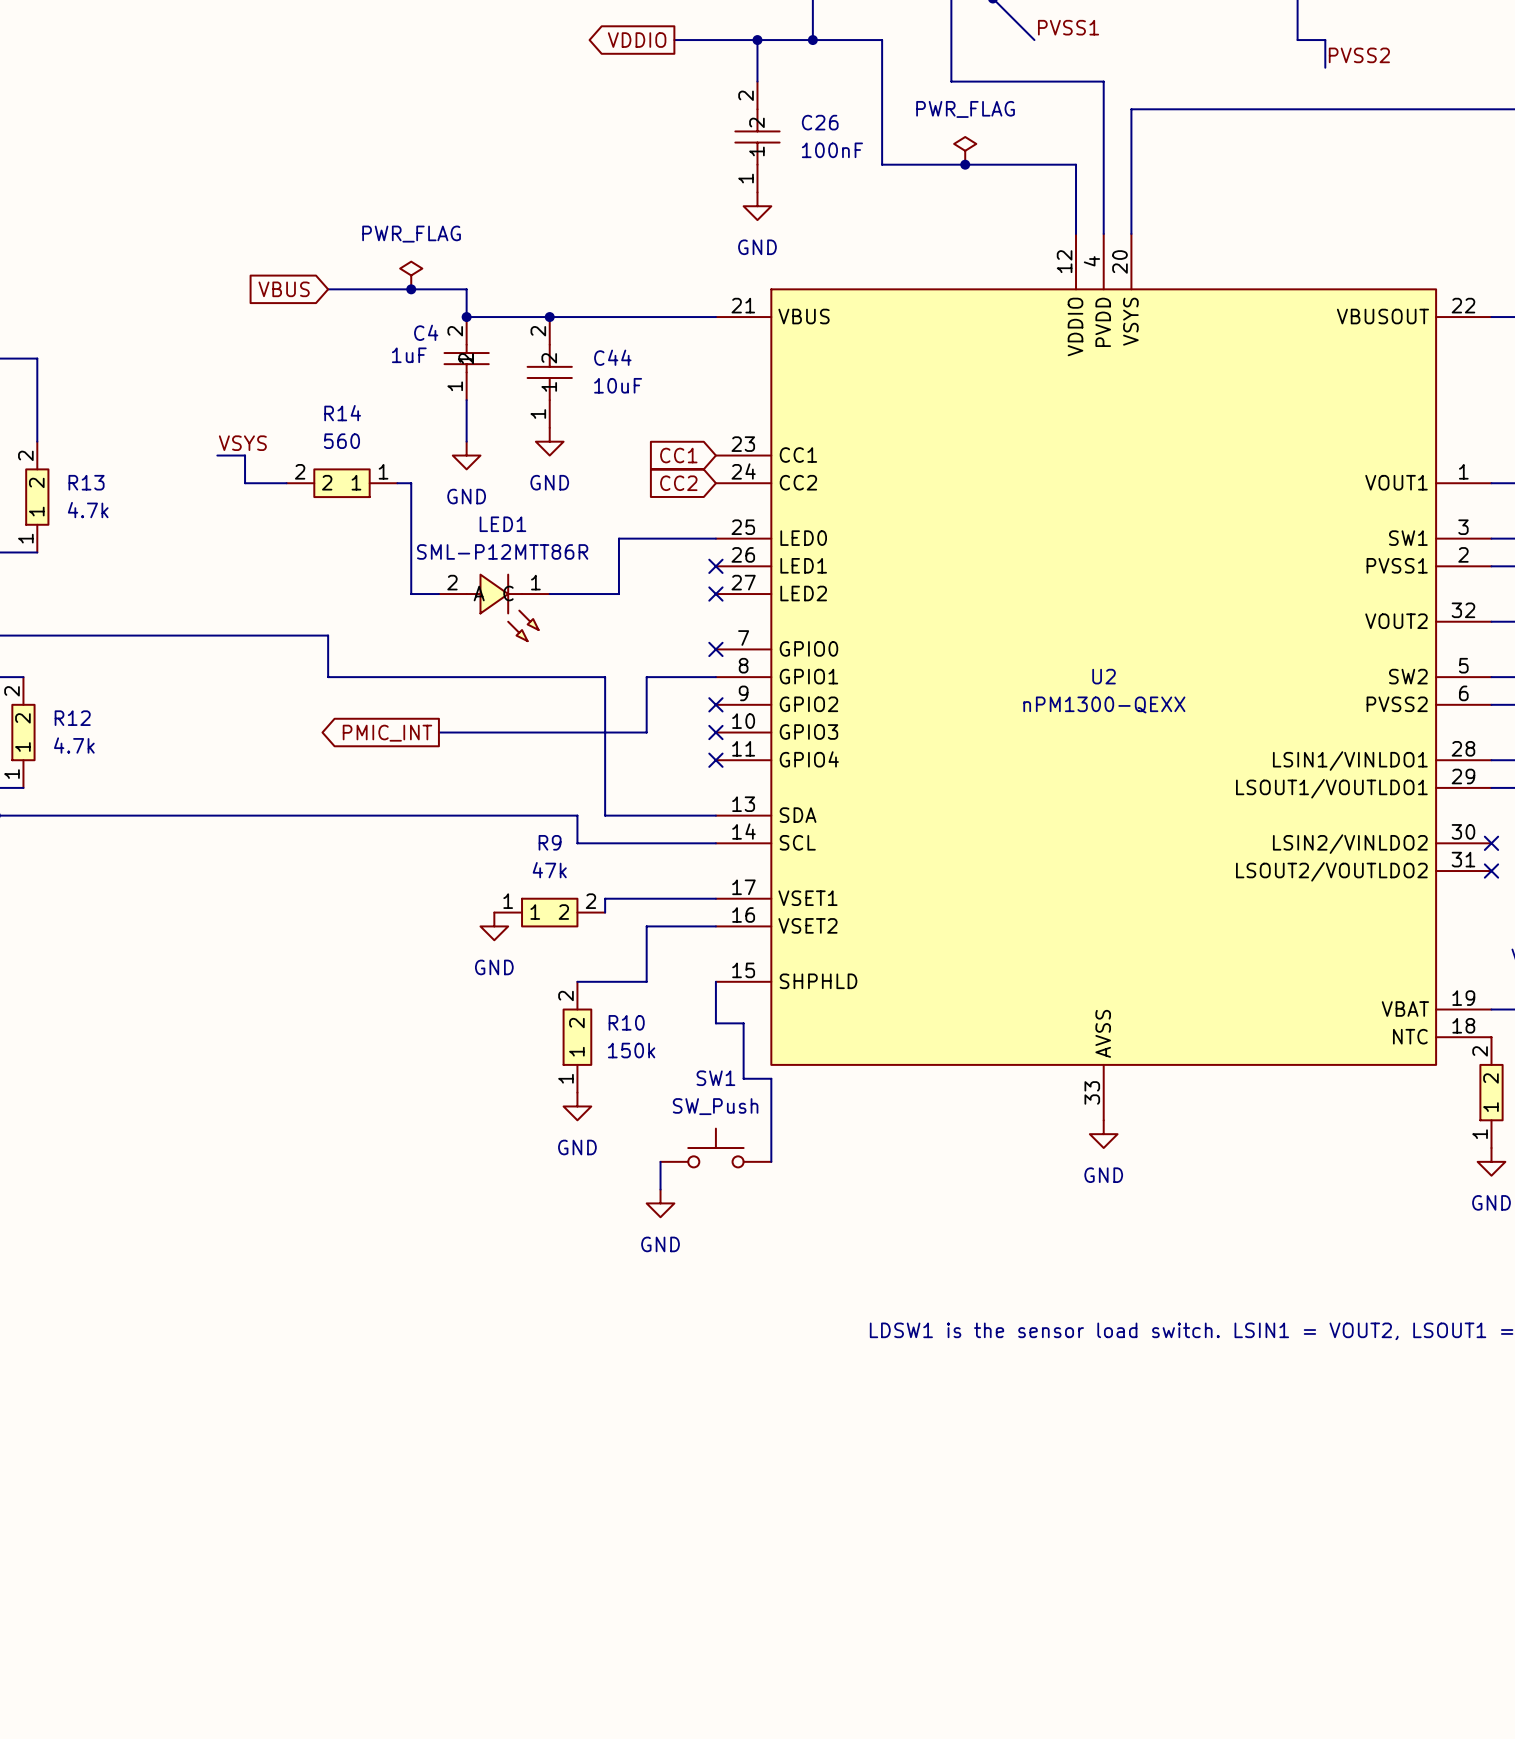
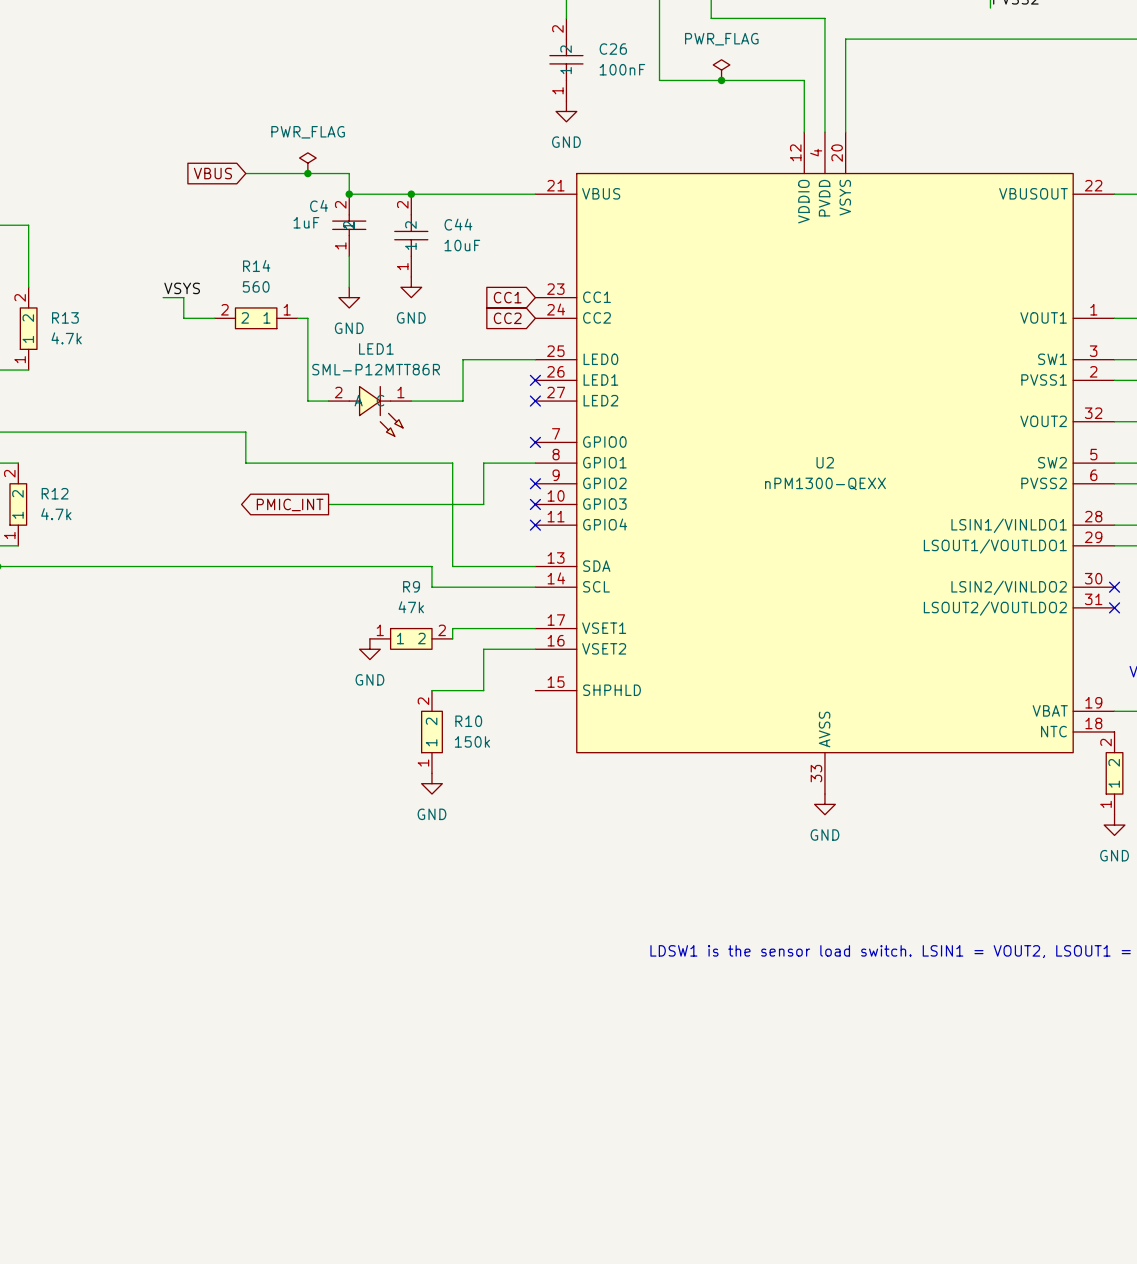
wire: (715, 981) (715, 1023) (743, 1023) (743, 1078) (771, 1078) (771, 1161) -> none
SW1: SW_Push (715, 1148) -> none
wire: (660, 1161) (660, 1189) -> none
power symbol: GND (660, 1203) -> none

